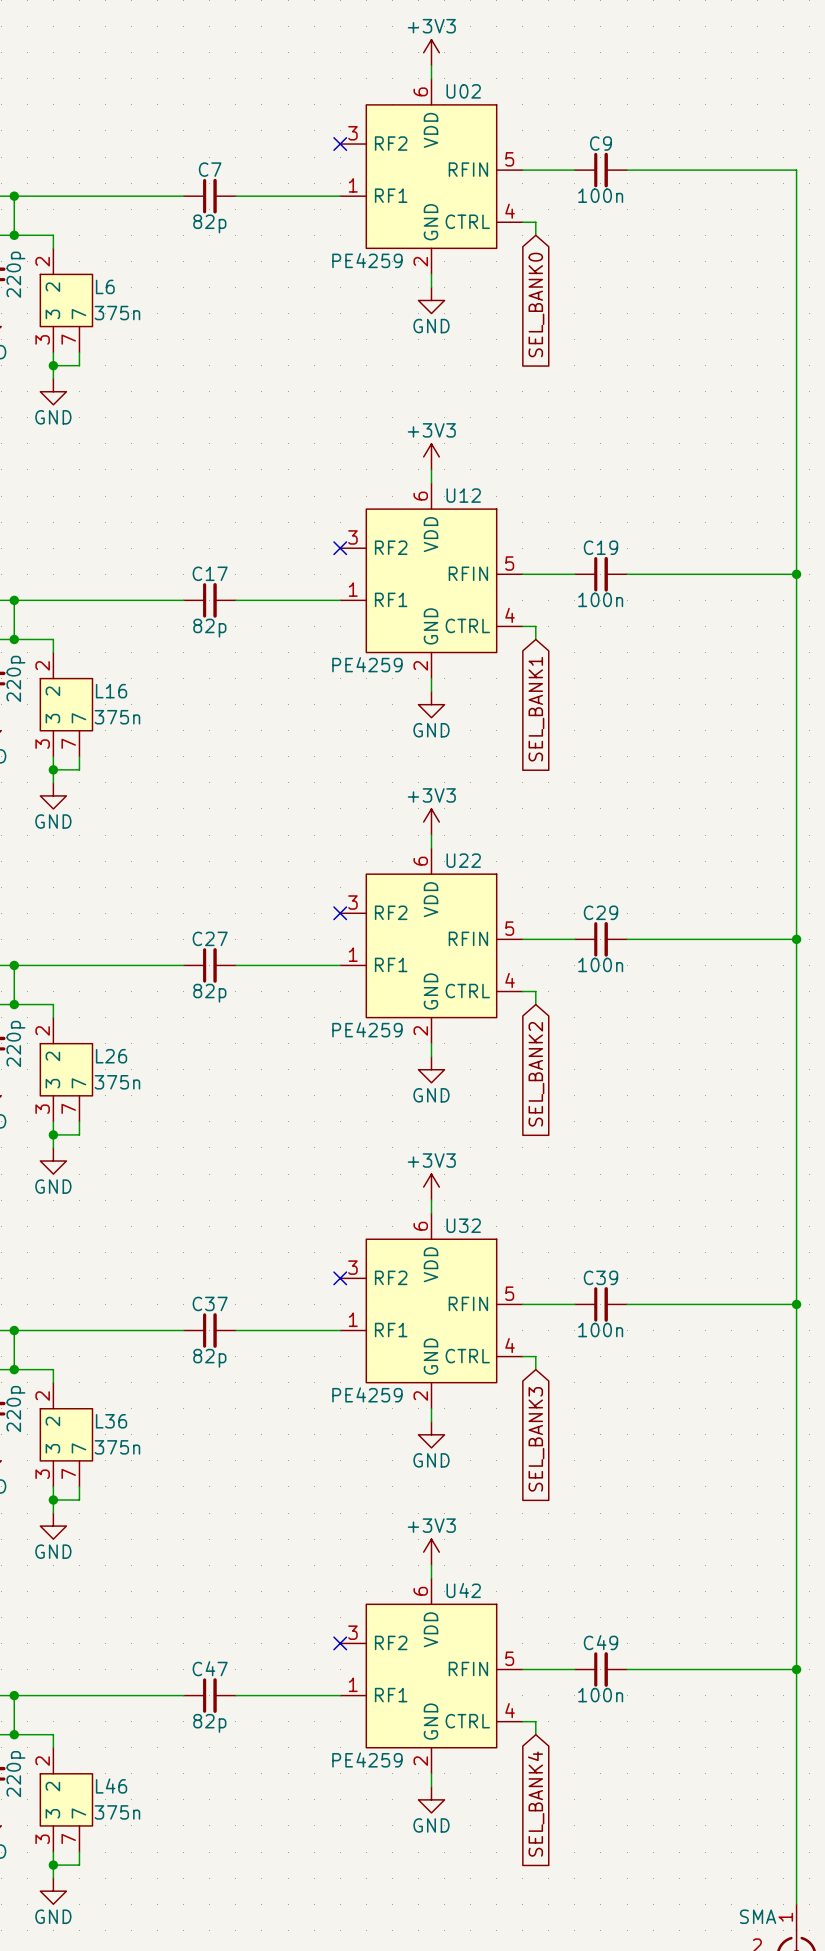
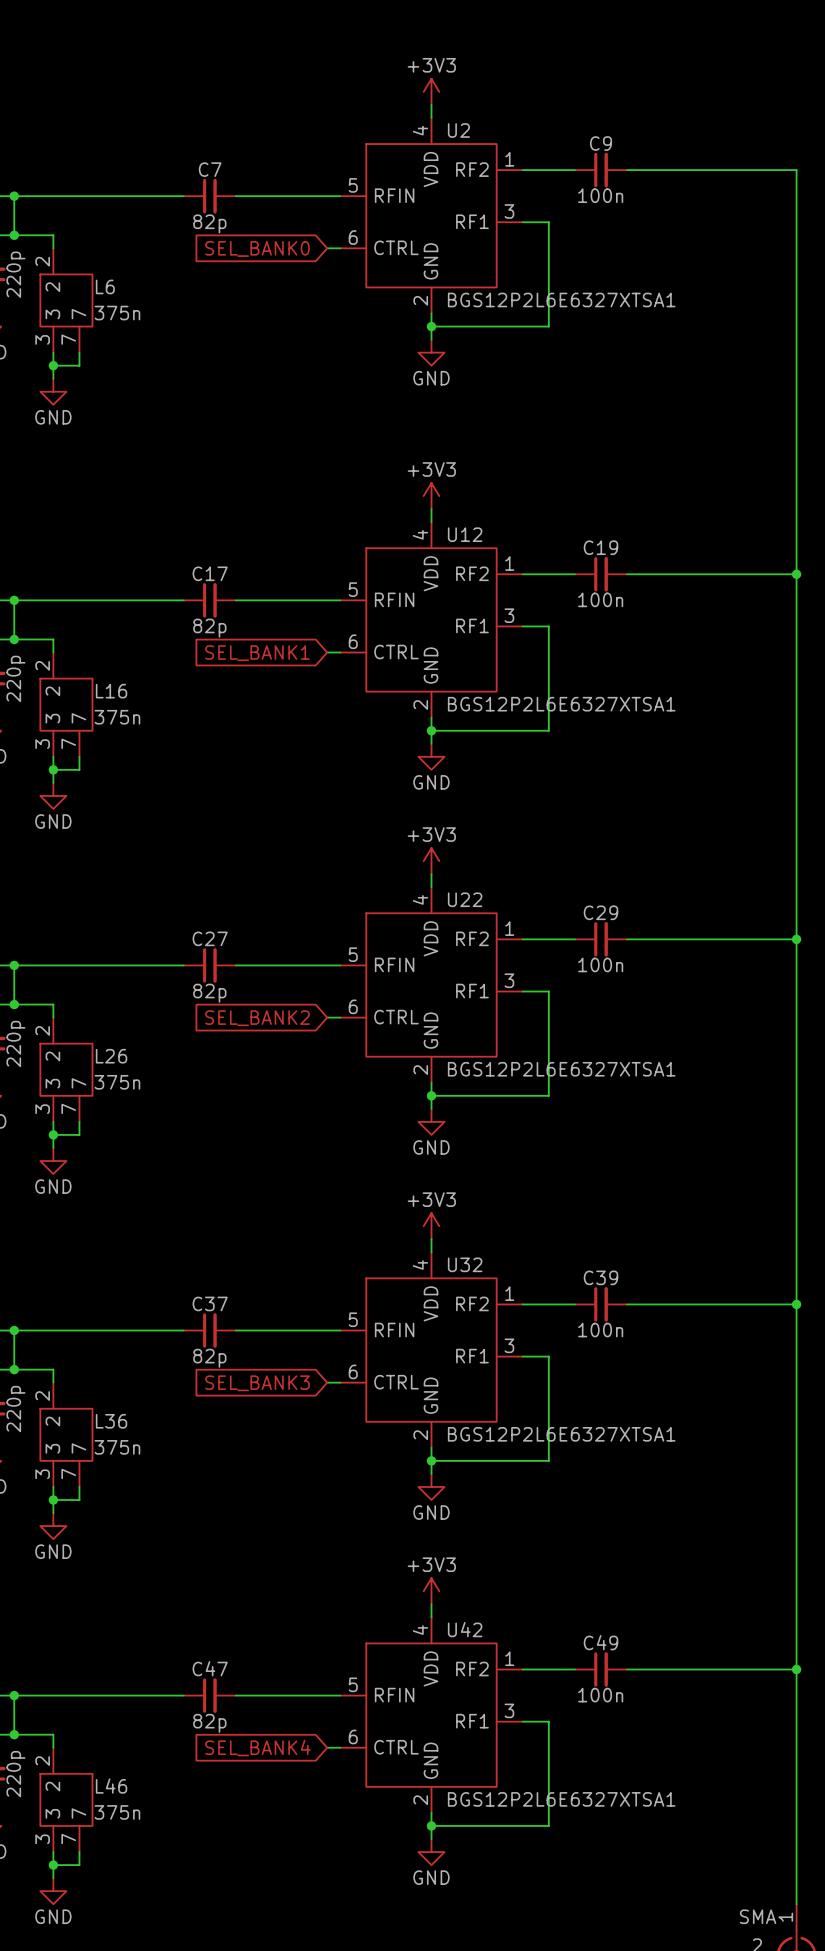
power symbol position: +3V3 (431, 52) -> +3V3 (431, 91)
no-connect mark: (340, 144) -> none
U02: PE4259 (431, 176) -> none
U2: none -> BGS12P2L6E6327XTSA1 (431, 215)
wire: (535, 222) (535, 235) -> (535, 222) (548, 222) (548, 326) (431, 326)
wire: none -> (327, 248) (340, 248)
wire: (431, 274) (431, 287) -> none
power symbol position: GND (431, 300) -> GND (431, 352)
global label rotation: 0° (536, 305) -> 90° clockwise (257, 248)
global label position: SEL_BANK0 (536, 305) -> SEL_BANK0 (257, 248)
wire: none -> (431, 313) (431, 339)
junction: none -> (431, 326)
power symbol position: +3V3 (431, 456) -> +3V3 (431, 496)
U12 symbol: [340, 483, 523, 679] -> [340, 522, 523, 718]
no-connect mark: (340, 548) -> none
wire: (535, 626) (535, 639) -> (535, 626) (548, 626) (548, 730) (431, 730)
wire: none -> (327, 652) (340, 652)
U12 value: PE4259 (367, 664) -> BGS12P2L6E6327XTSA1 (561, 704)
wire: (431, 678) (431, 691) -> none
power symbol position: GND (431, 704) -> GND (431, 756)
global label rotation: 0° (536, 709) -> 90° clockwise (257, 653)
global label position: SEL_BANK1 (536, 709) -> SEL_BANK1 (257, 653)
wire: none -> (431, 717) (431, 743)
junction: none -> (431, 730)
power symbol position: +3V3 (431, 822) -> +3V3 (431, 861)
U22 symbol: [340, 848, 523, 1044] -> [340, 887, 523, 1083]
no-connect mark: (340, 913) -> none
wire: (535, 991) (535, 1004) -> (535, 991) (548, 991) (548, 1095) (431, 1095)
wire: none -> (327, 1017) (340, 1017)
U22 value: PE4259 (367, 1029) -> BGS12P2L6E6327XTSA1 (561, 1069)
wire: (431, 1043) (431, 1056) -> none
power symbol position: GND (431, 1069) -> GND (431, 1121)
global label rotation: 0° (536, 1074) -> 90° clockwise (257, 1018)
global label position: SEL_BANK2 (536, 1074) -> SEL_BANK2 (257, 1018)
wire: none -> (431, 1082) (431, 1108)
junction: none -> (431, 1095)
power symbol position: +3V3 (431, 1187) -> +3V3 (431, 1226)
U32 symbol: [340, 1213, 523, 1409] -> [340, 1252, 523, 1448]
no-connect mark: (340, 1278) -> none
wire: (535, 1356) (535, 1369) -> (535, 1356) (548, 1356) (548, 1460) (431, 1460)
wire: none -> (327, 1382) (340, 1382)
U32 value: PE4259 (367, 1394) -> BGS12P2L6E6327XTSA1 (561, 1434)
wire: (431, 1408) (431, 1421) -> none
power symbol position: GND (431, 1434) -> GND (431, 1486)
global label rotation: 0° (536, 1439) -> 90° clockwise (257, 1383)
global label position: SEL_BANK3 (536, 1439) -> SEL_BANK3 (257, 1383)
wire: none -> (431, 1447) (431, 1473)
junction: none -> (431, 1460)
power symbol position: +3V3 (431, 1552) -> +3V3 (431, 1591)
U42 symbol: [340, 1578, 523, 1774] -> [340, 1617, 523, 1813]
no-connect mark: (340, 1643) -> none
wire: (535, 1721) (535, 1734) -> (535, 1721) (548, 1721) (548, 1825) (431, 1825)
wire: none -> (327, 1747) (340, 1747)
U42 value: PE4259 (367, 1759) -> BGS12P2L6E6327XTSA1 (561, 1799)
wire: (431, 1773) (431, 1786) -> none
power symbol position: GND (431, 1799) -> GND (431, 1852)
global label rotation: 0° (536, 1804) -> 90° clockwise (257, 1748)
global label position: SEL_BANK4 (536, 1804) -> SEL_BANK4 (257, 1748)
wire: none -> (431, 1812) (431, 1839)
junction: none -> (431, 1825)

